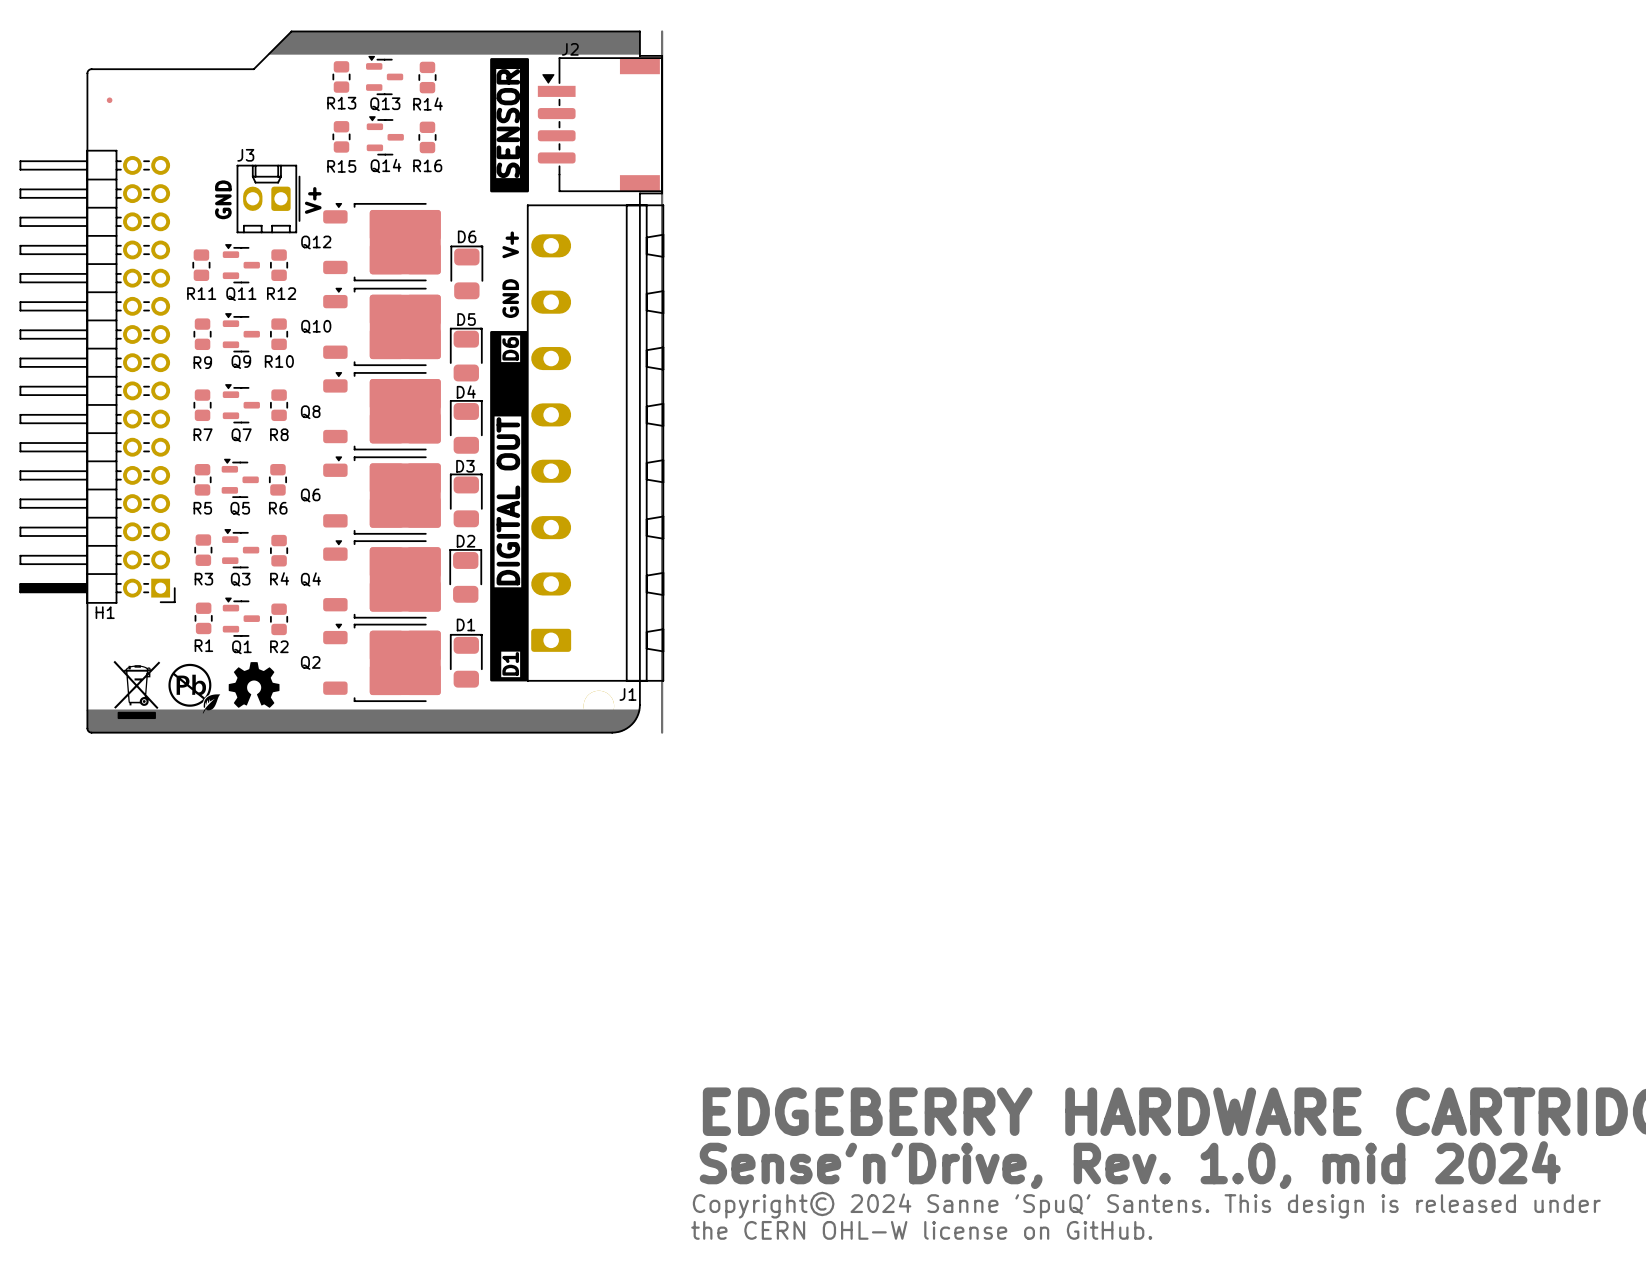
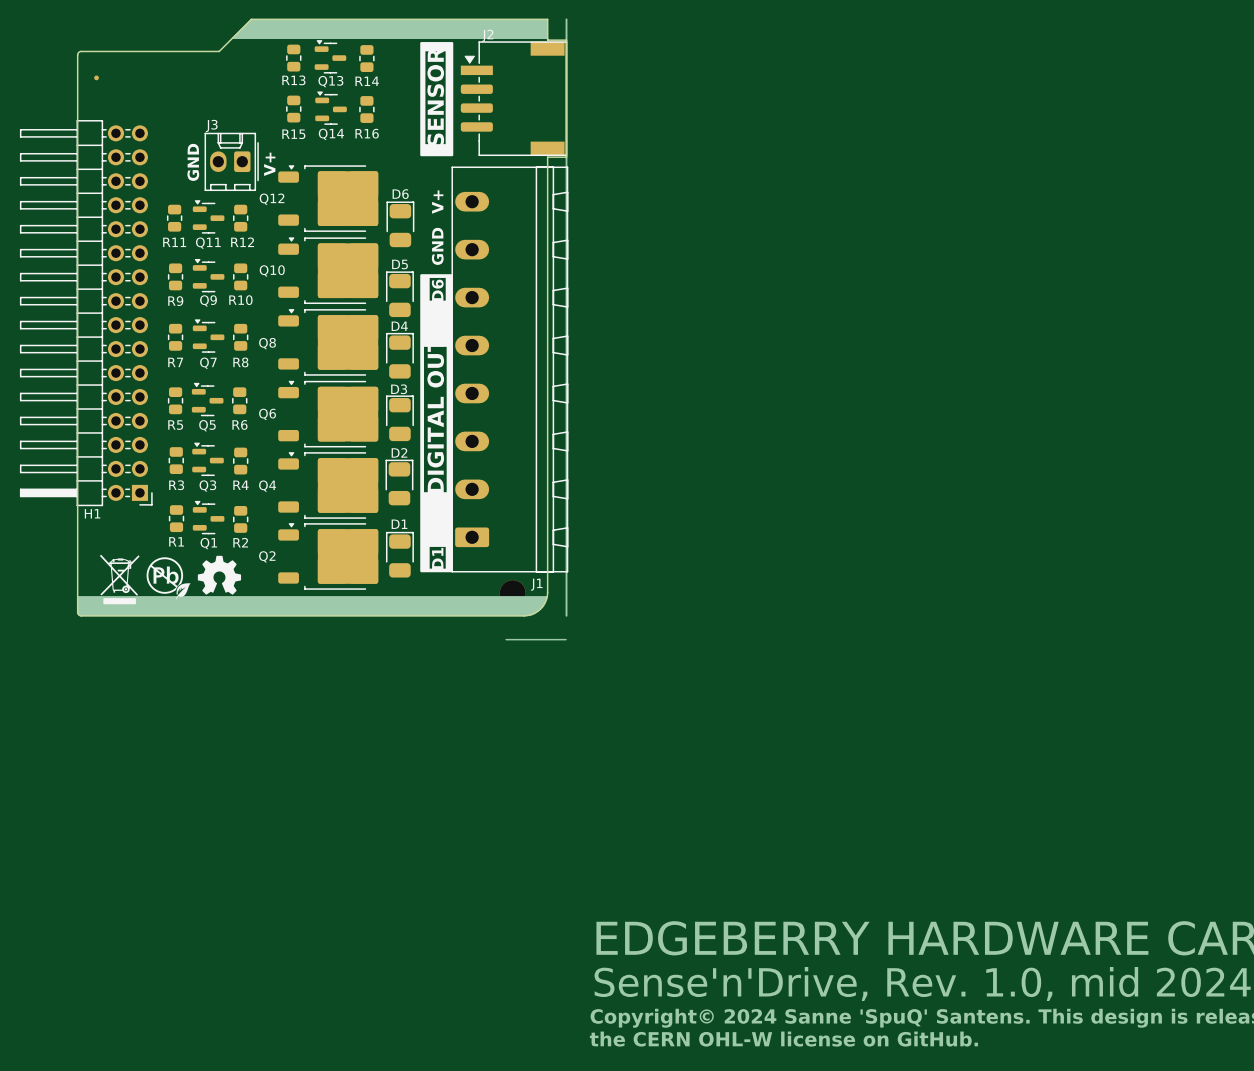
line: none -> (506, 639) (566, 639)

